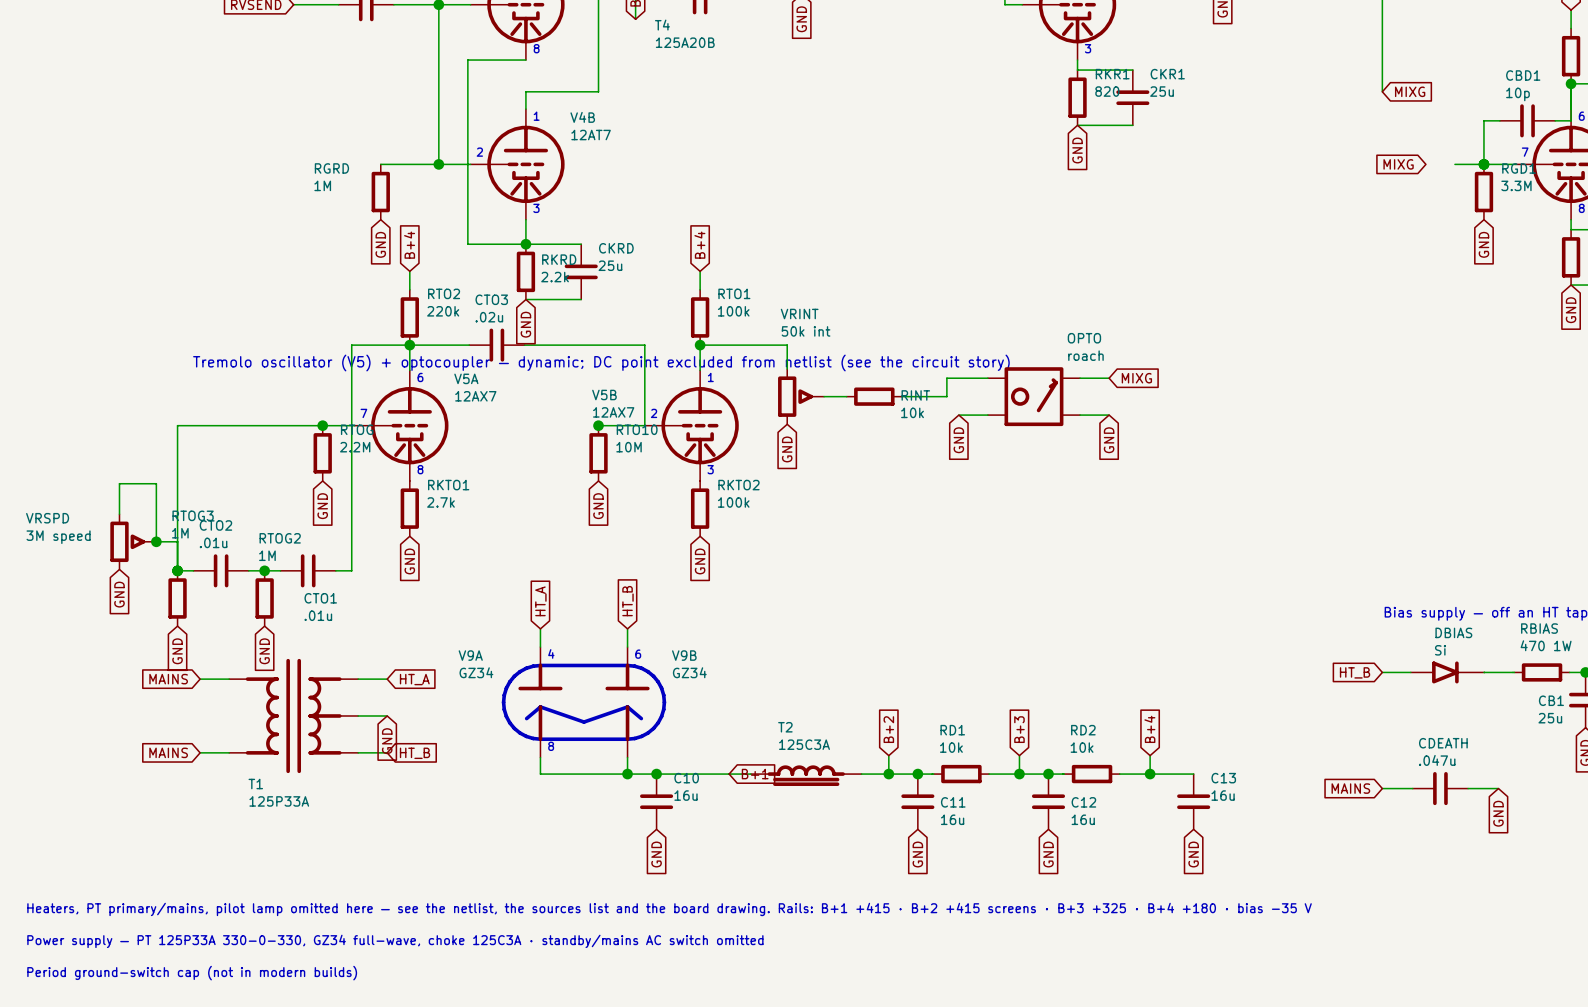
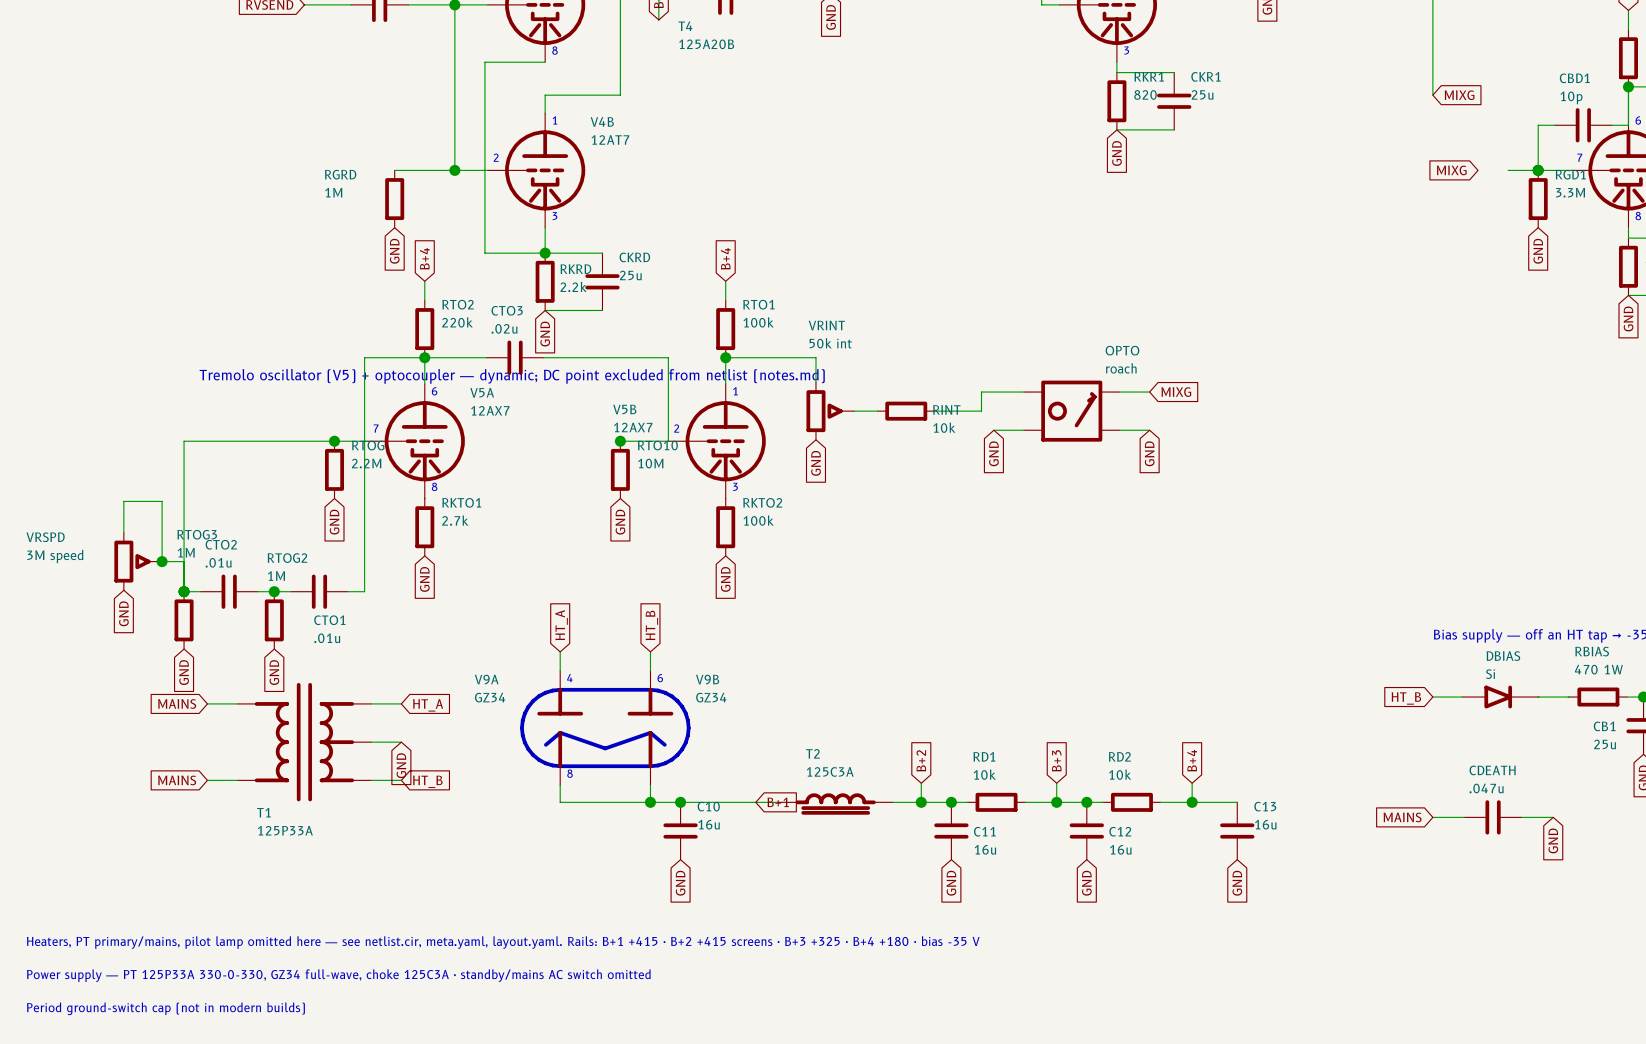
text: Tremolo oscillator (V5) + optocoupler — dynamic; DC point excluded from netlist (see the circuit story) (601, 363) -> Tremolo oscillator (V5) + optocoupler — dynamic; DC point excluded from netlist (notes.md) (512, 376)
text: Heaters, PT primary/mains, pilot lamp omitted here — see the netlist, the sources list and the board drawing. Rails: B+1 +415 · B+2 +415 screens · B+3 +325 · B+4 +180 · bias -35 V (669, 909) -> Heaters, PT primary/mains, pilot lamp omitted here — see netlist.cir, meta.yaml, layout.yaml. Rails: B+1 +415 · B+2 +415 screens · B+3 +325 · B+4 +180 · bias -35 V (503, 942)

